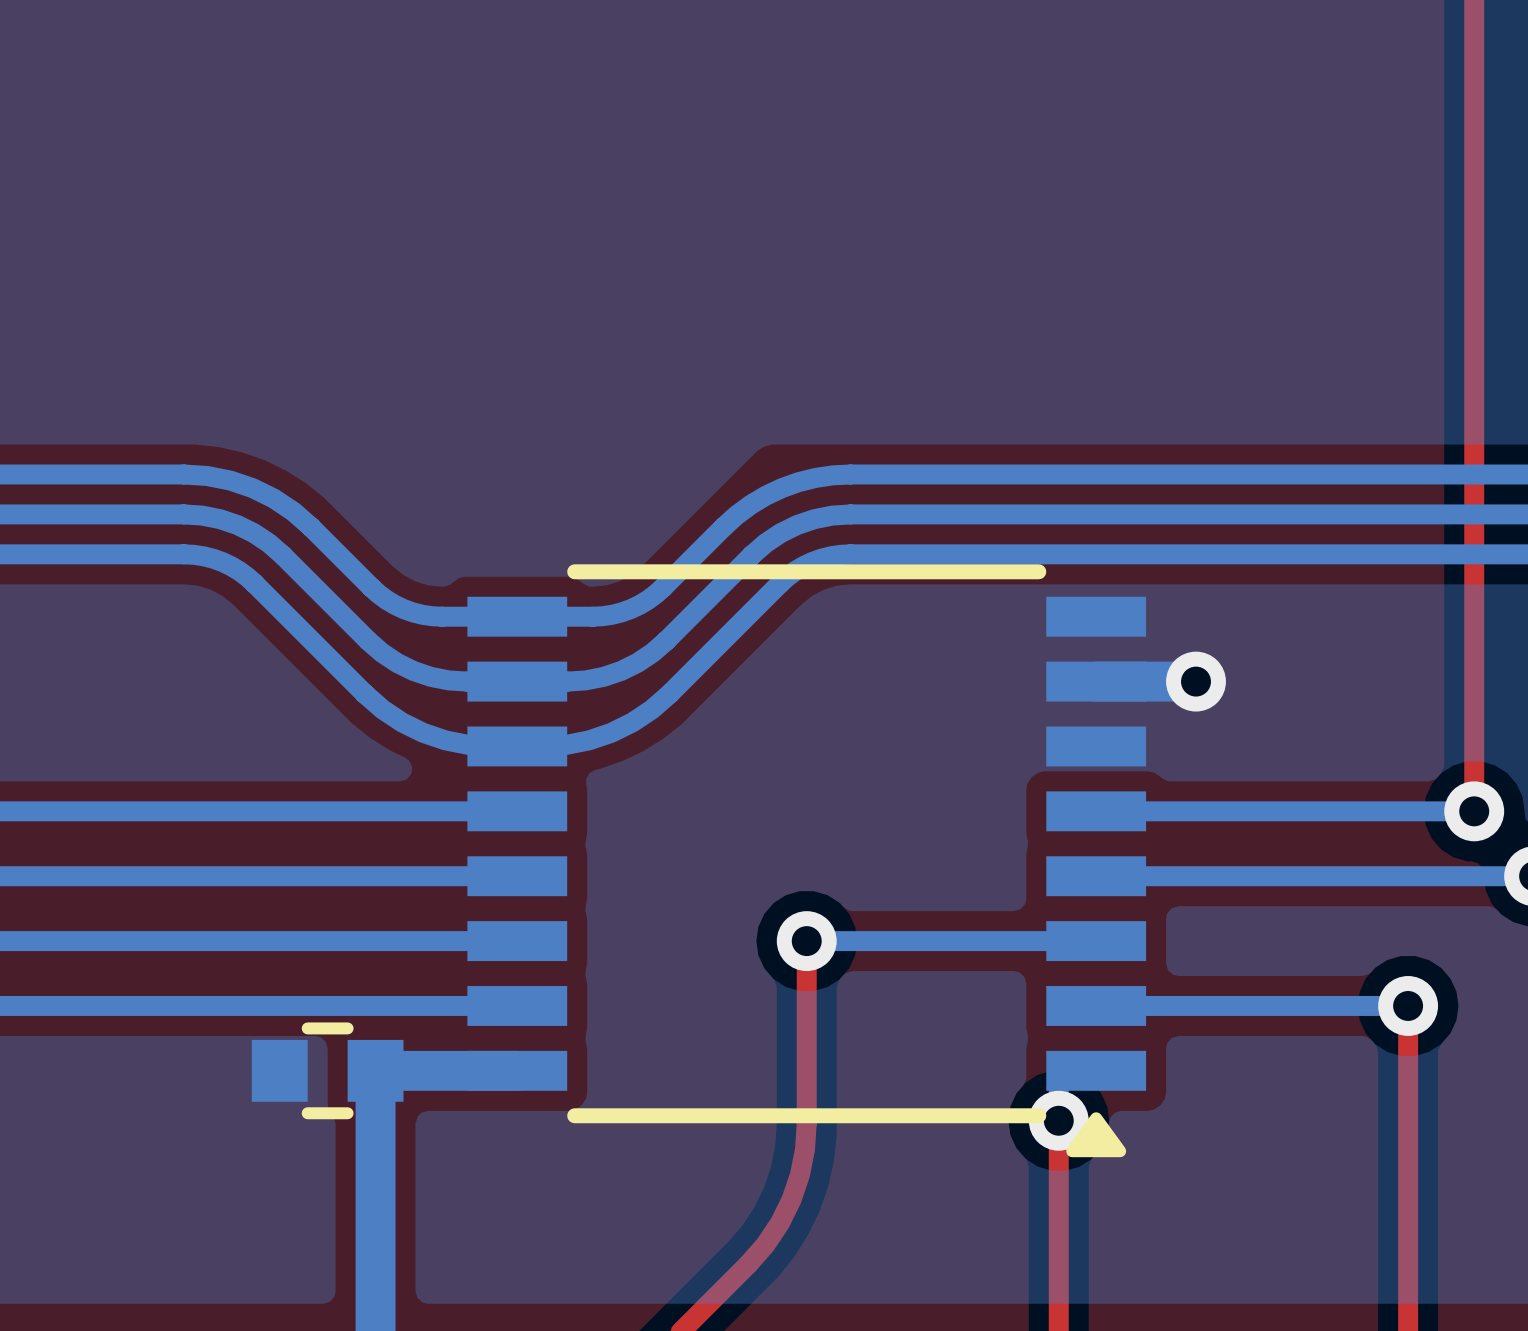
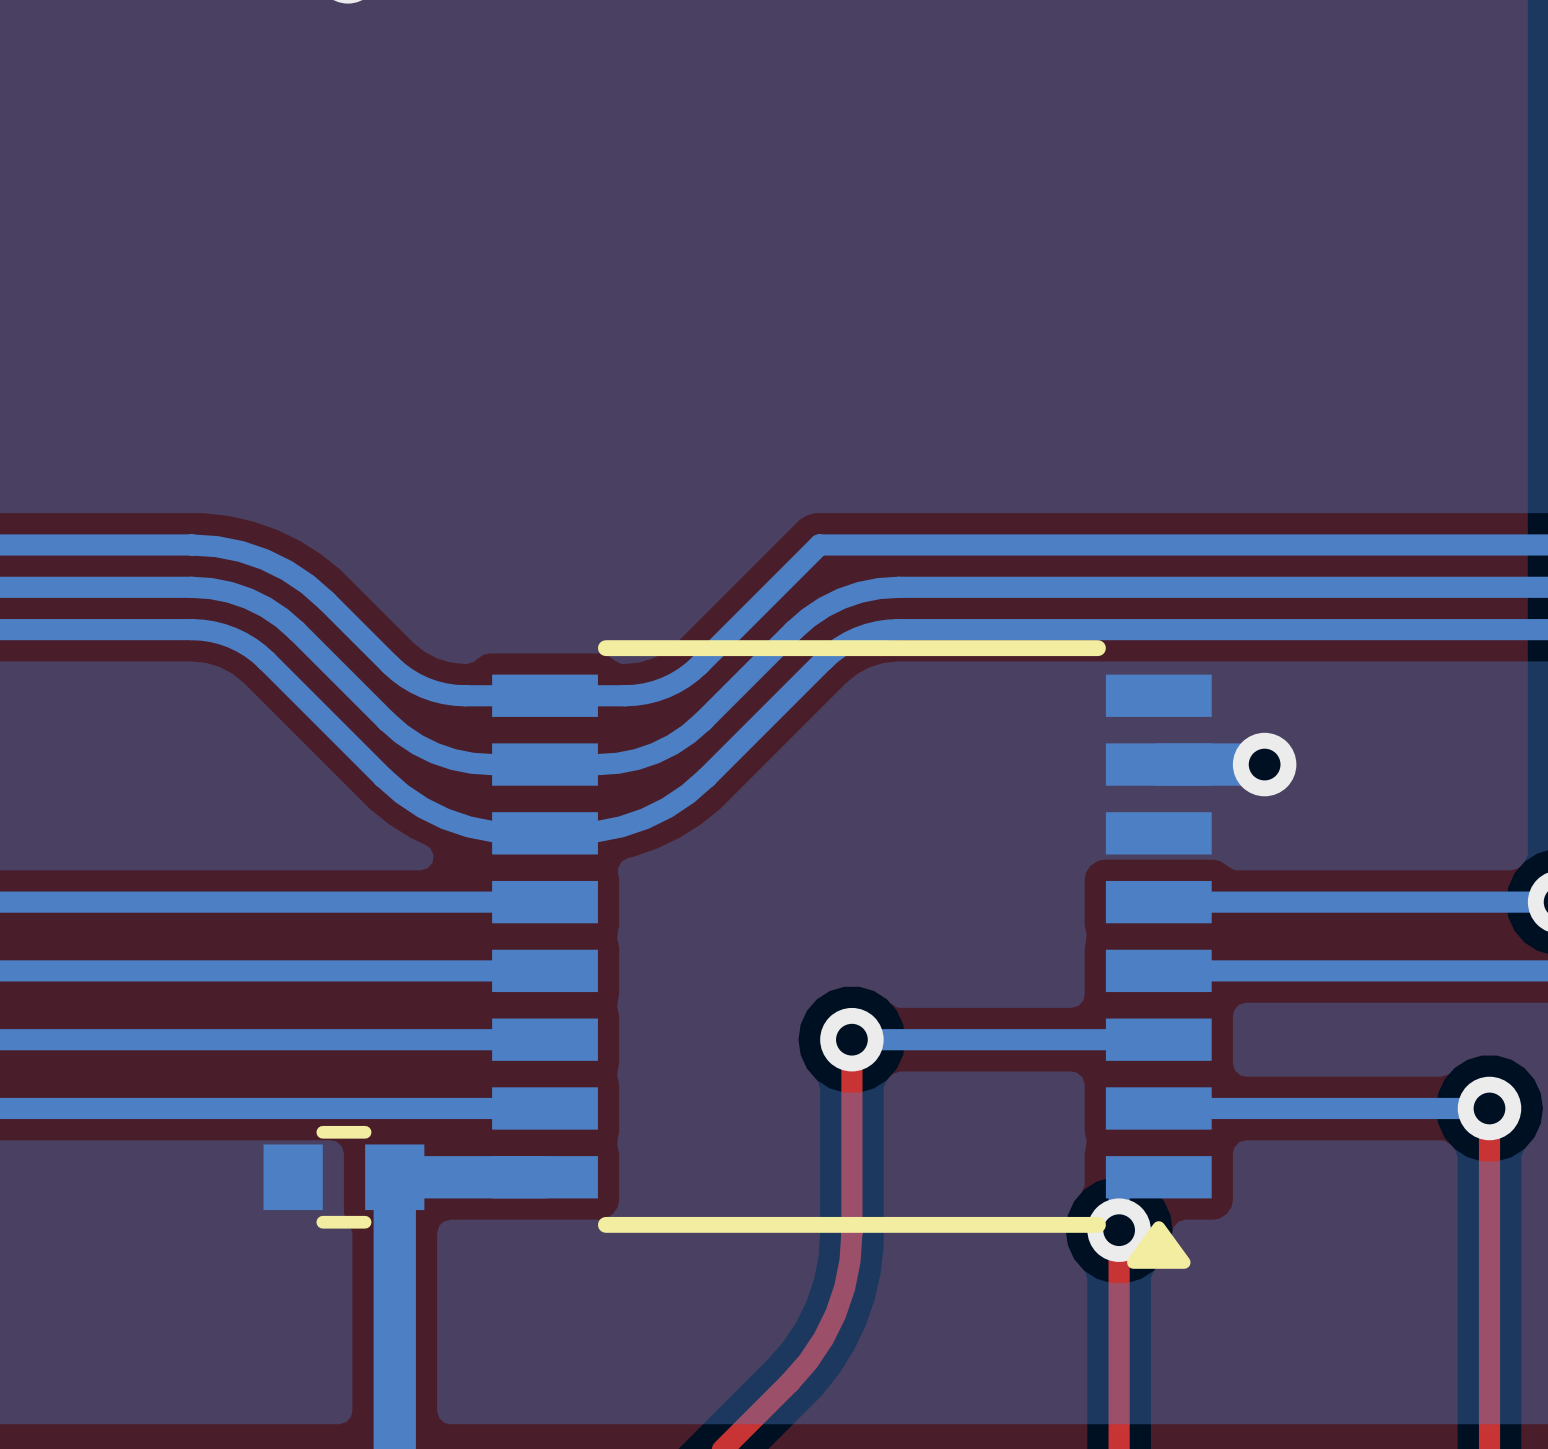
bottom track: (850, 474) (815, 477) (781, 488) (750, 504) (723, 527) -> (898, 544) (819, 544) (763, 600)

